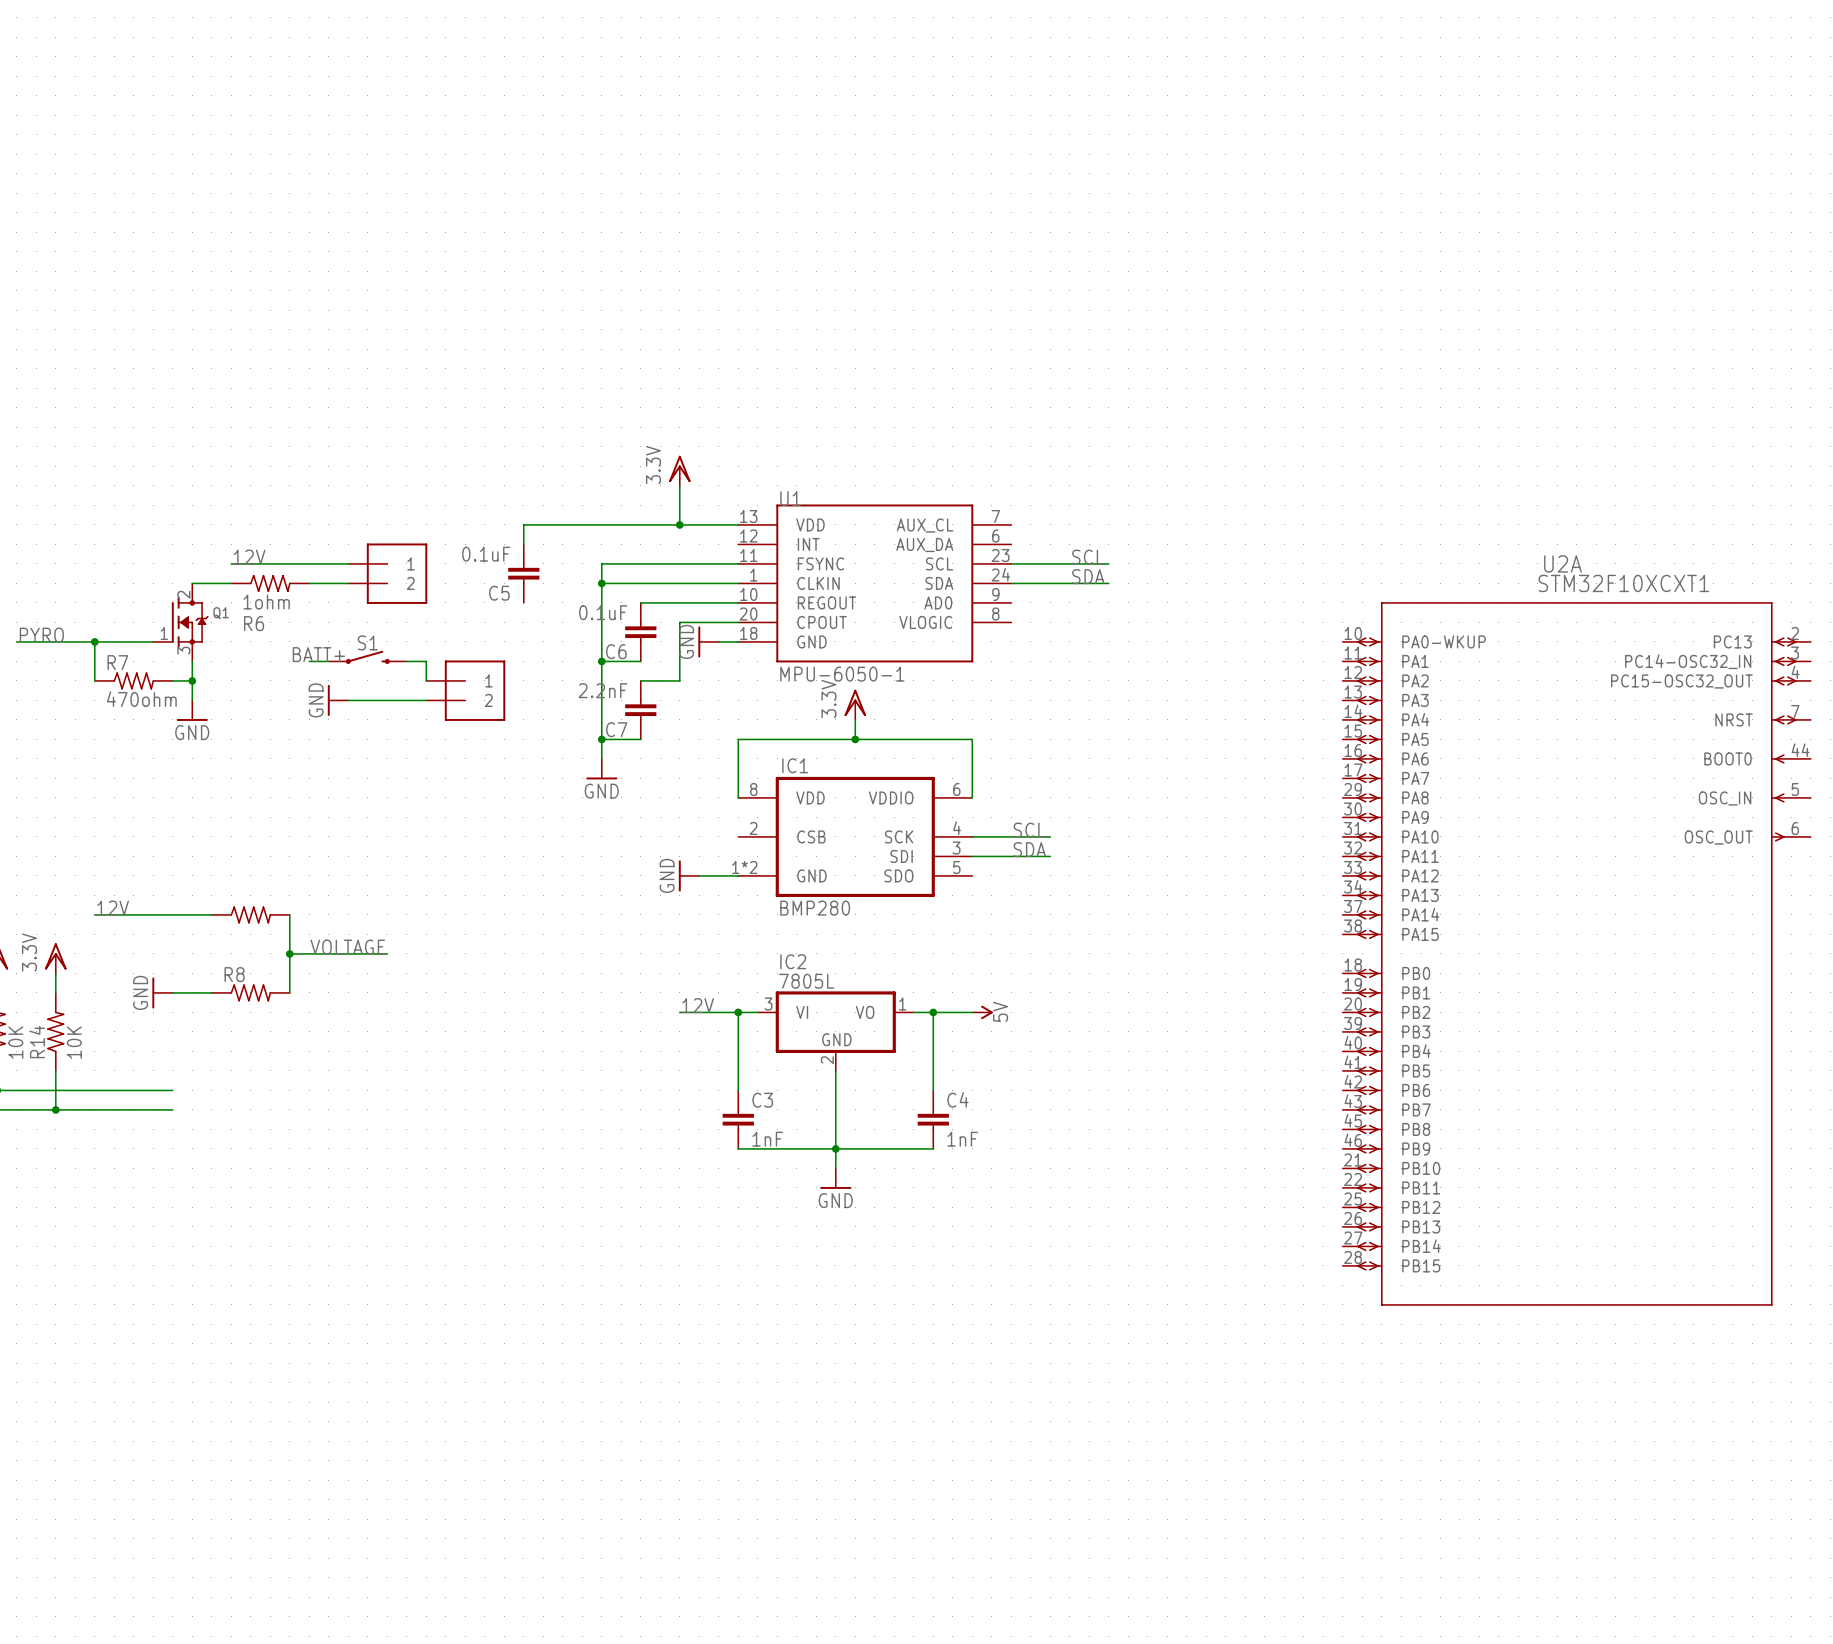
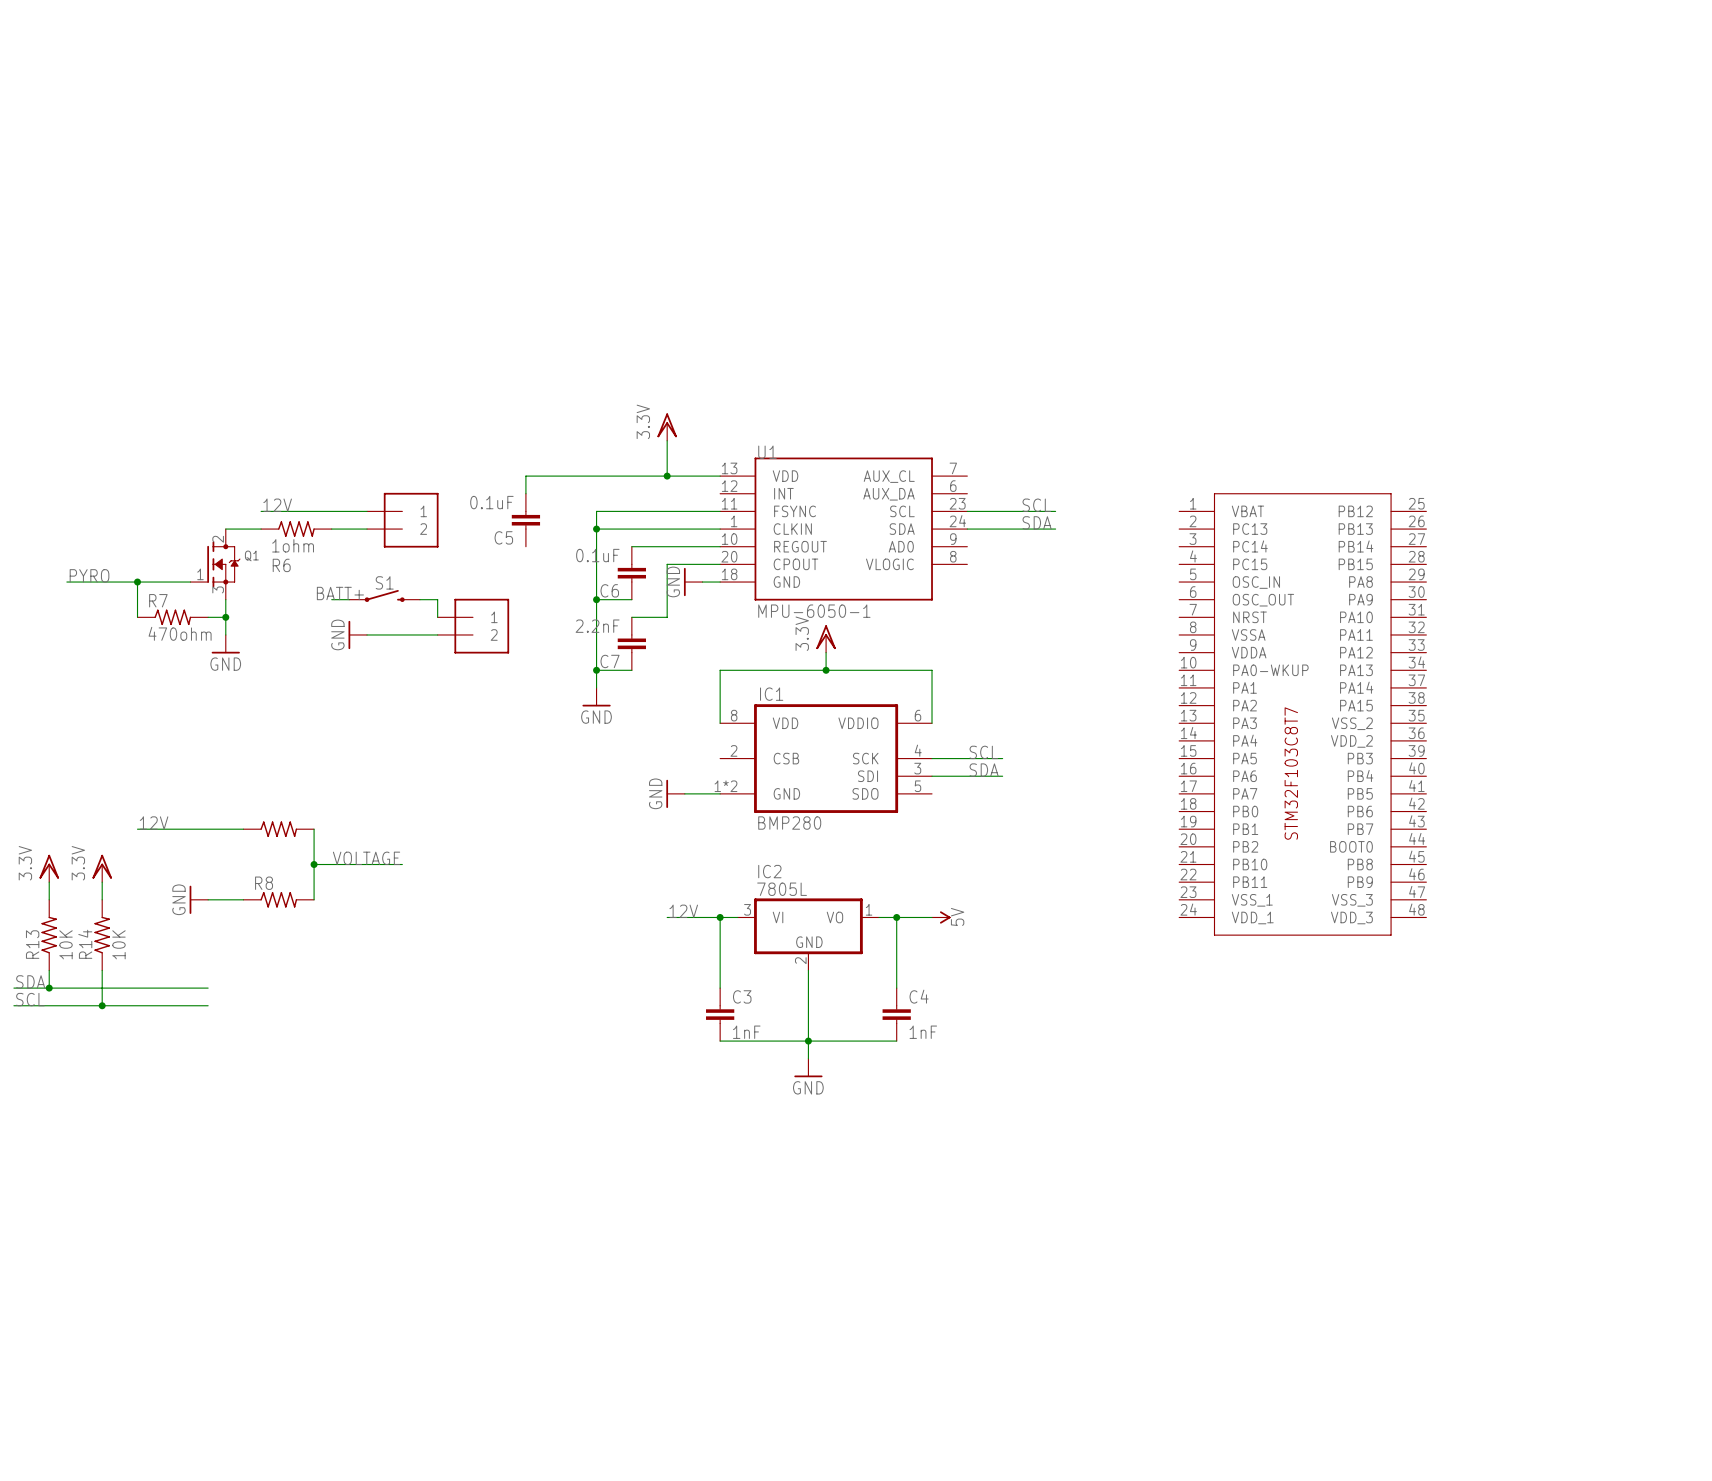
part: none -> (1302, 714)
U2A: STM32F10XCXT1 (1576, 953) -> none

